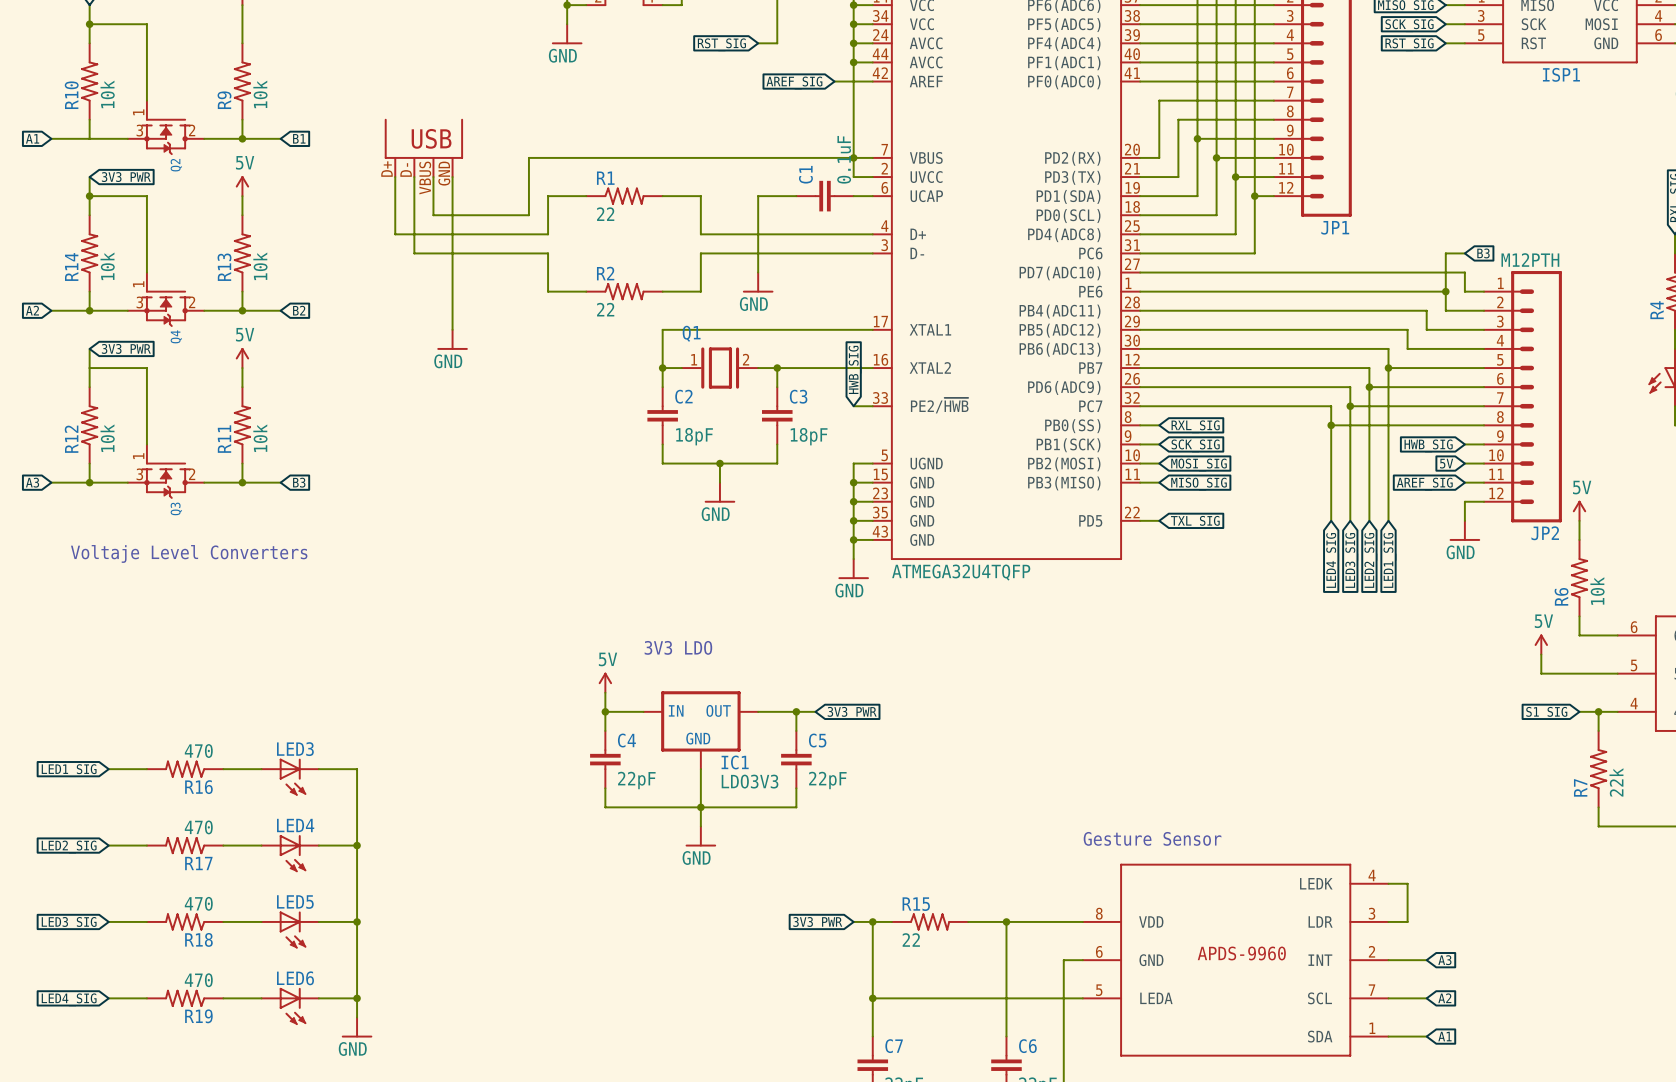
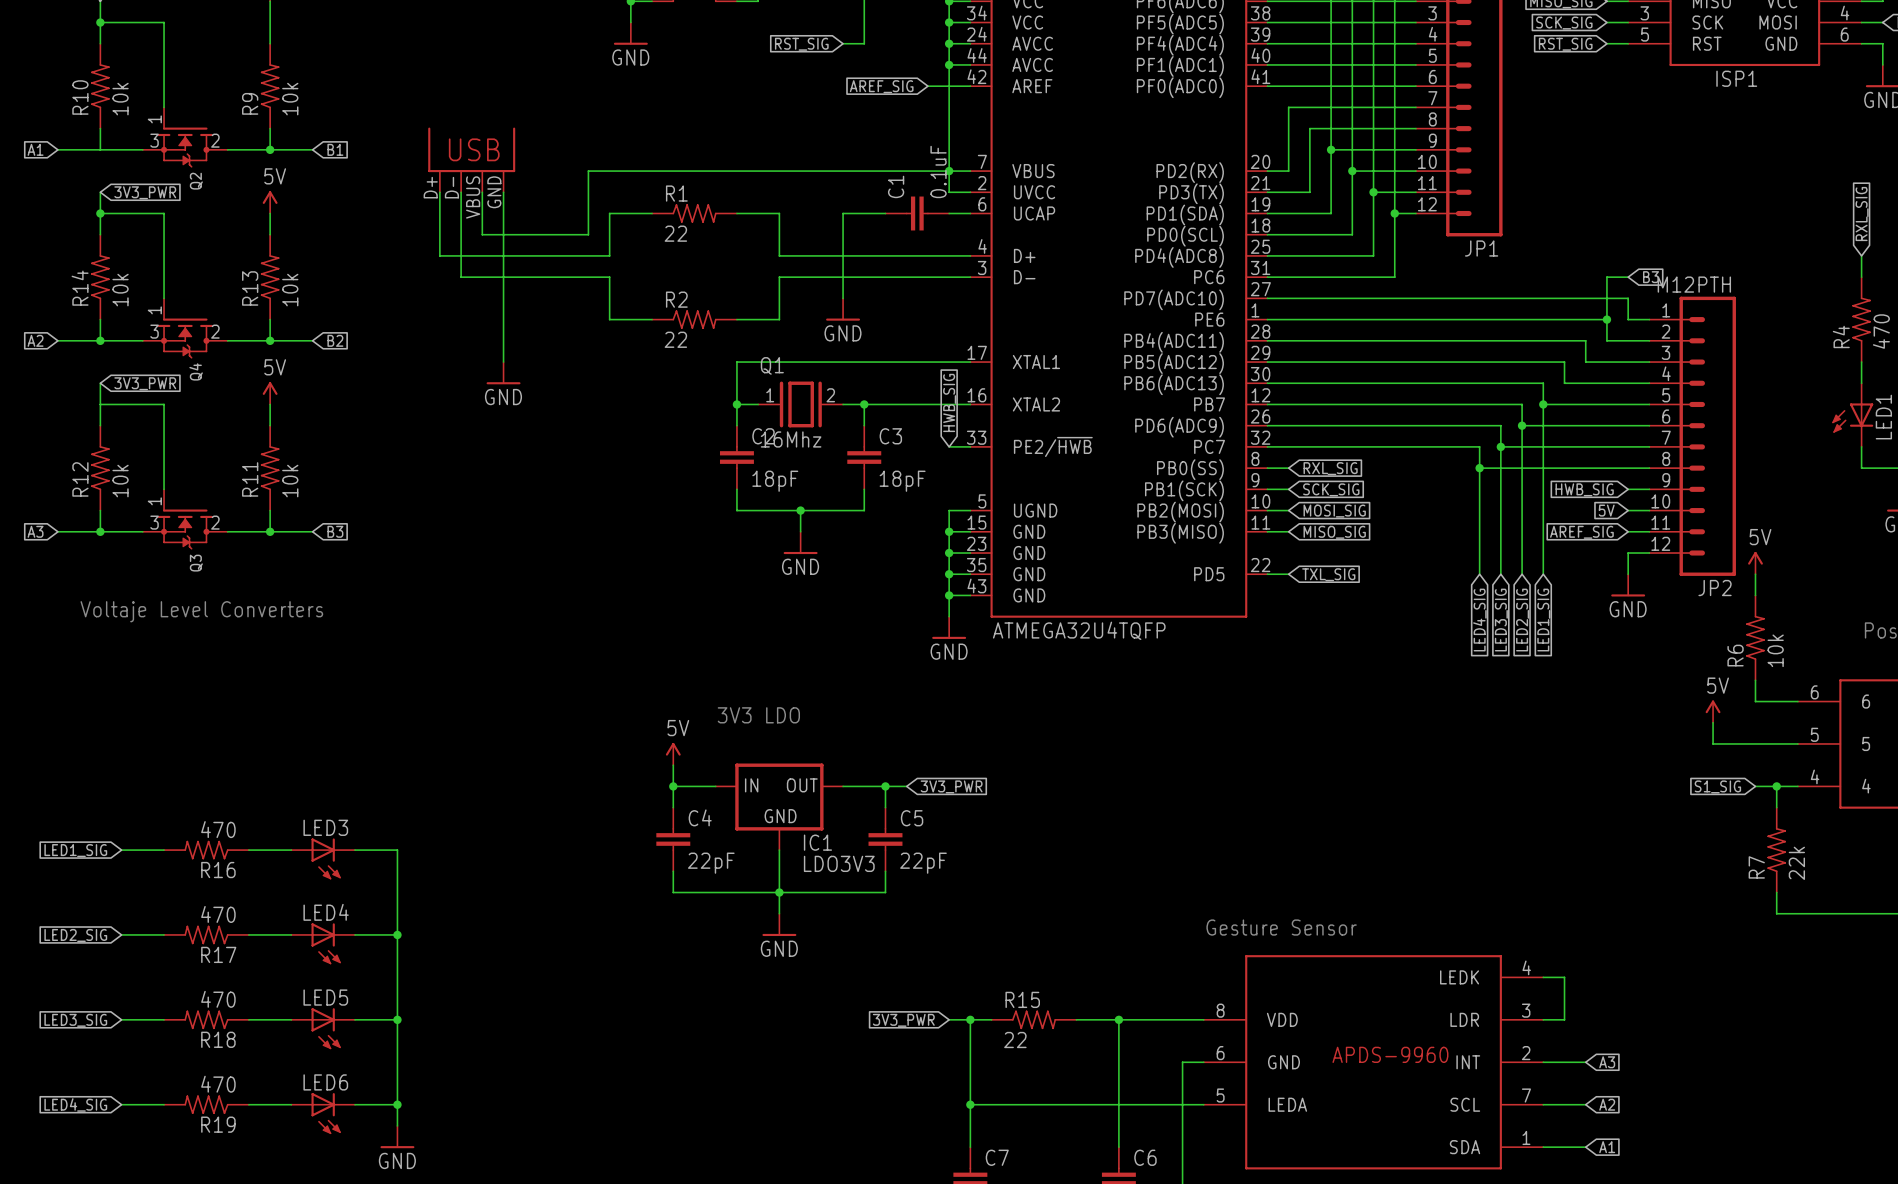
Q1 value: none -> 16Mhz (791, 439)

